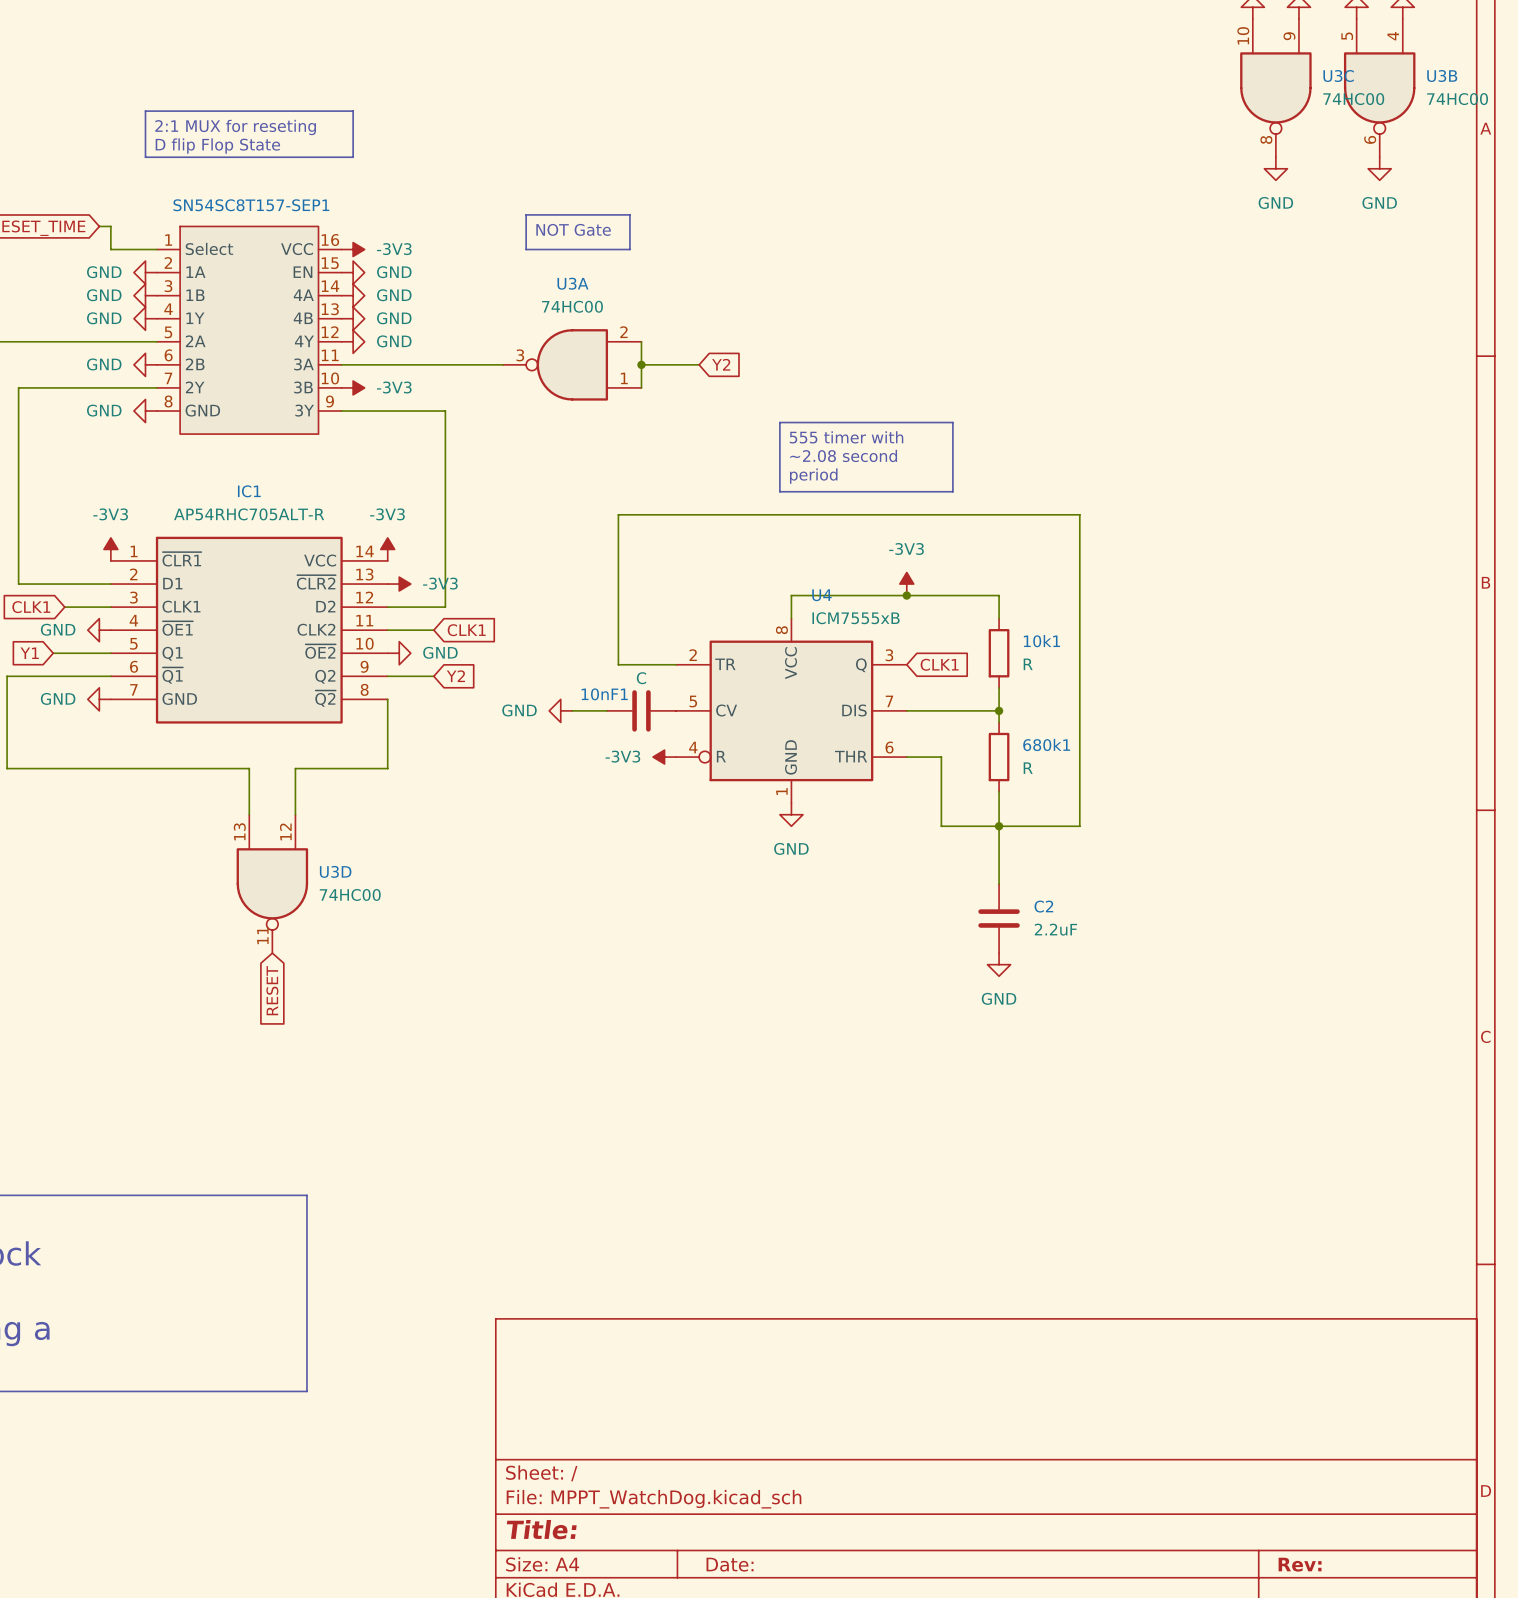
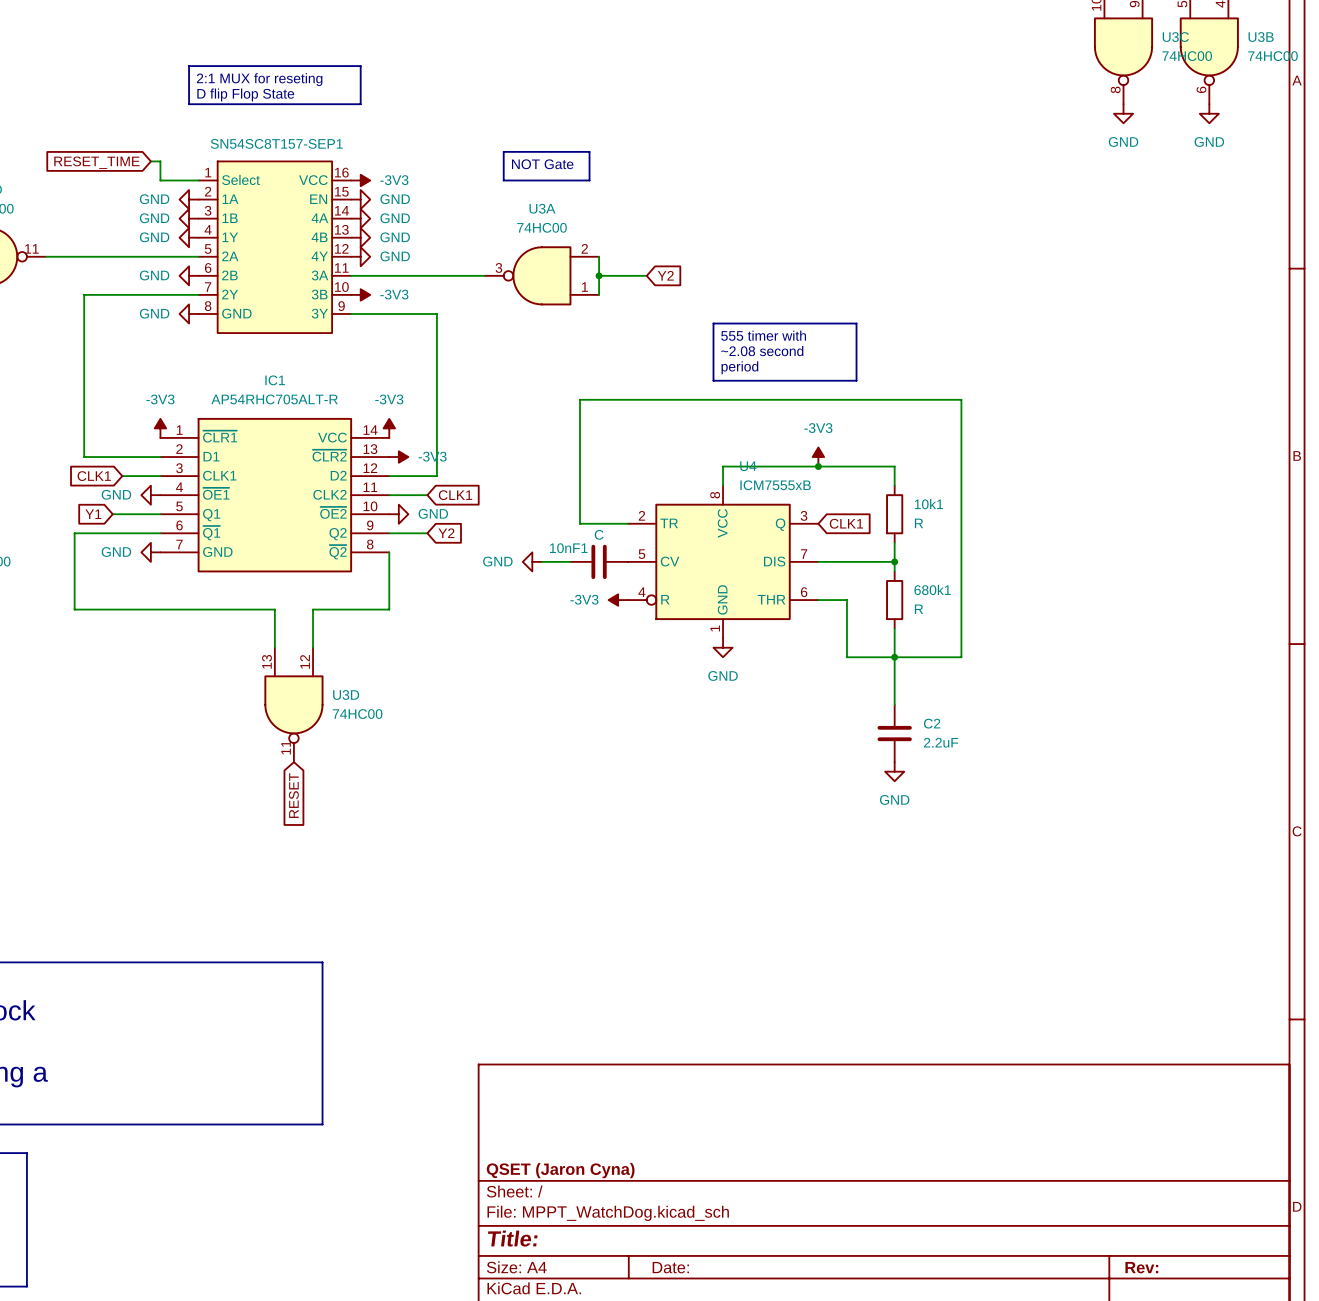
title block: none -> QSET (Jaron Cyna) (560, 1170)

